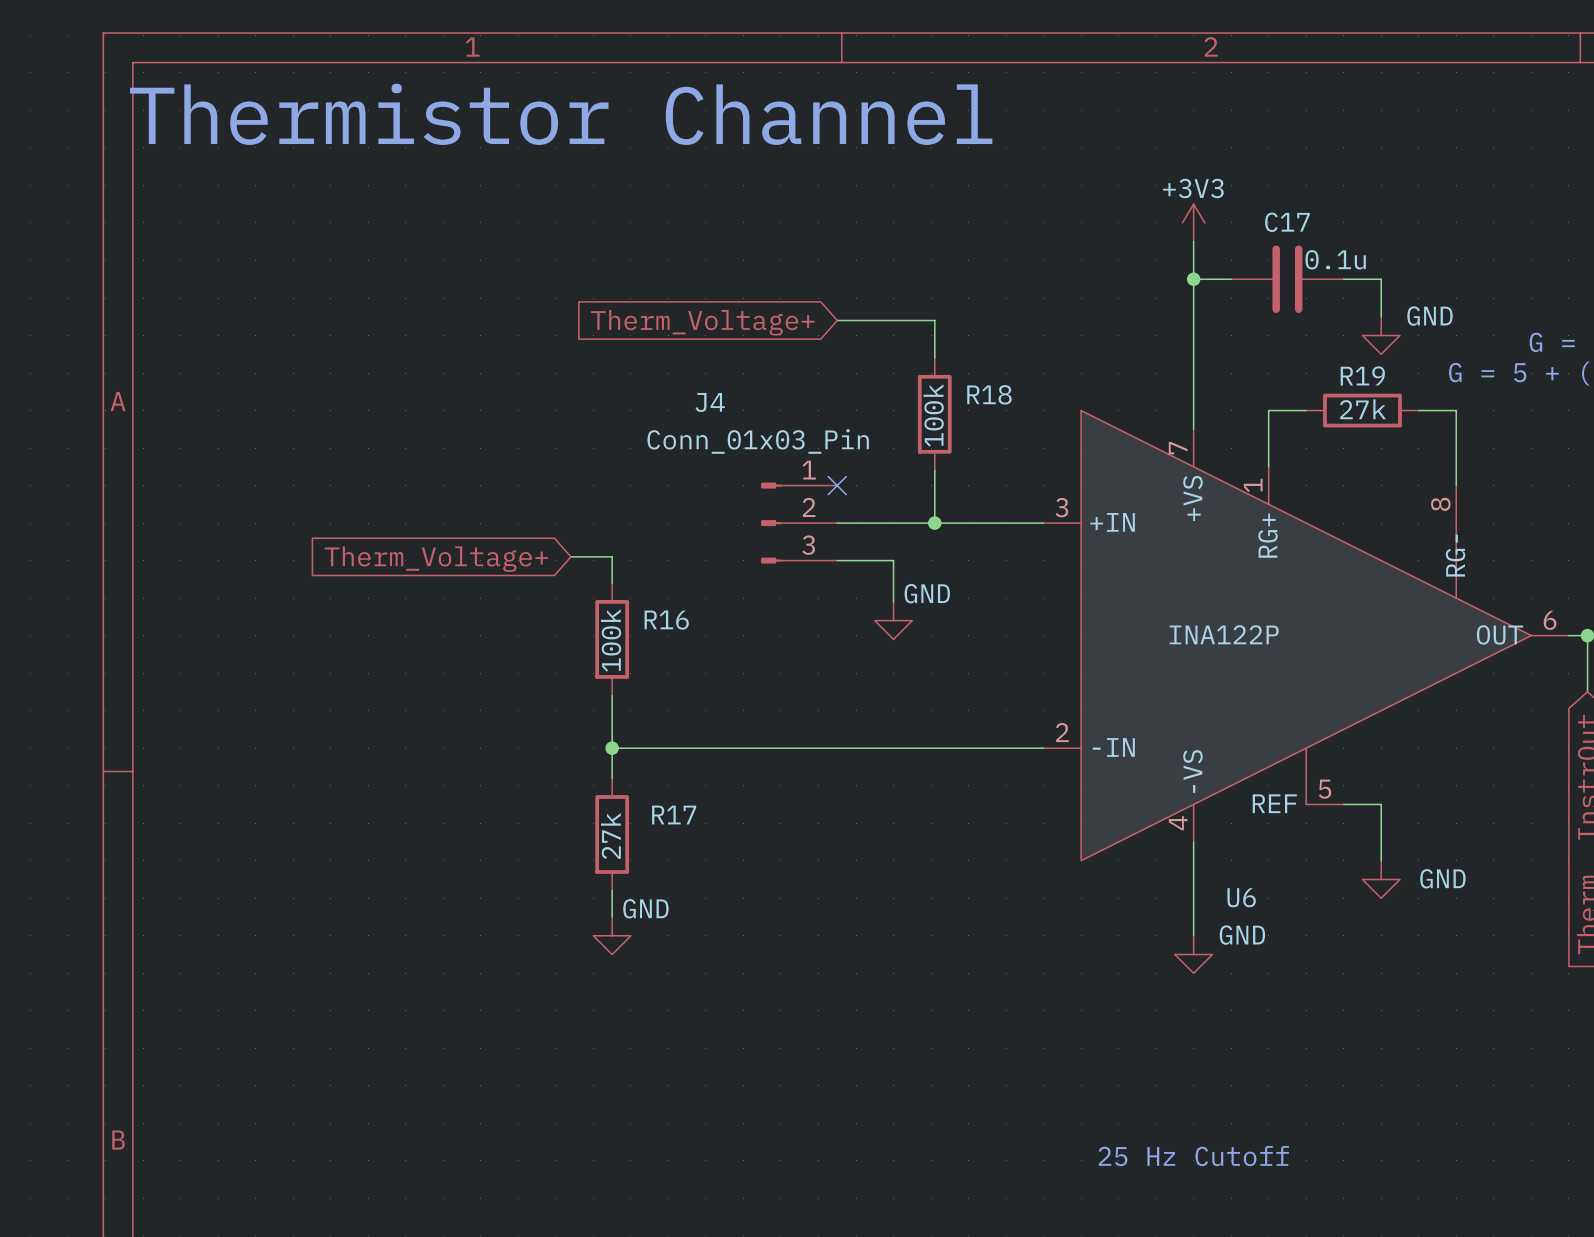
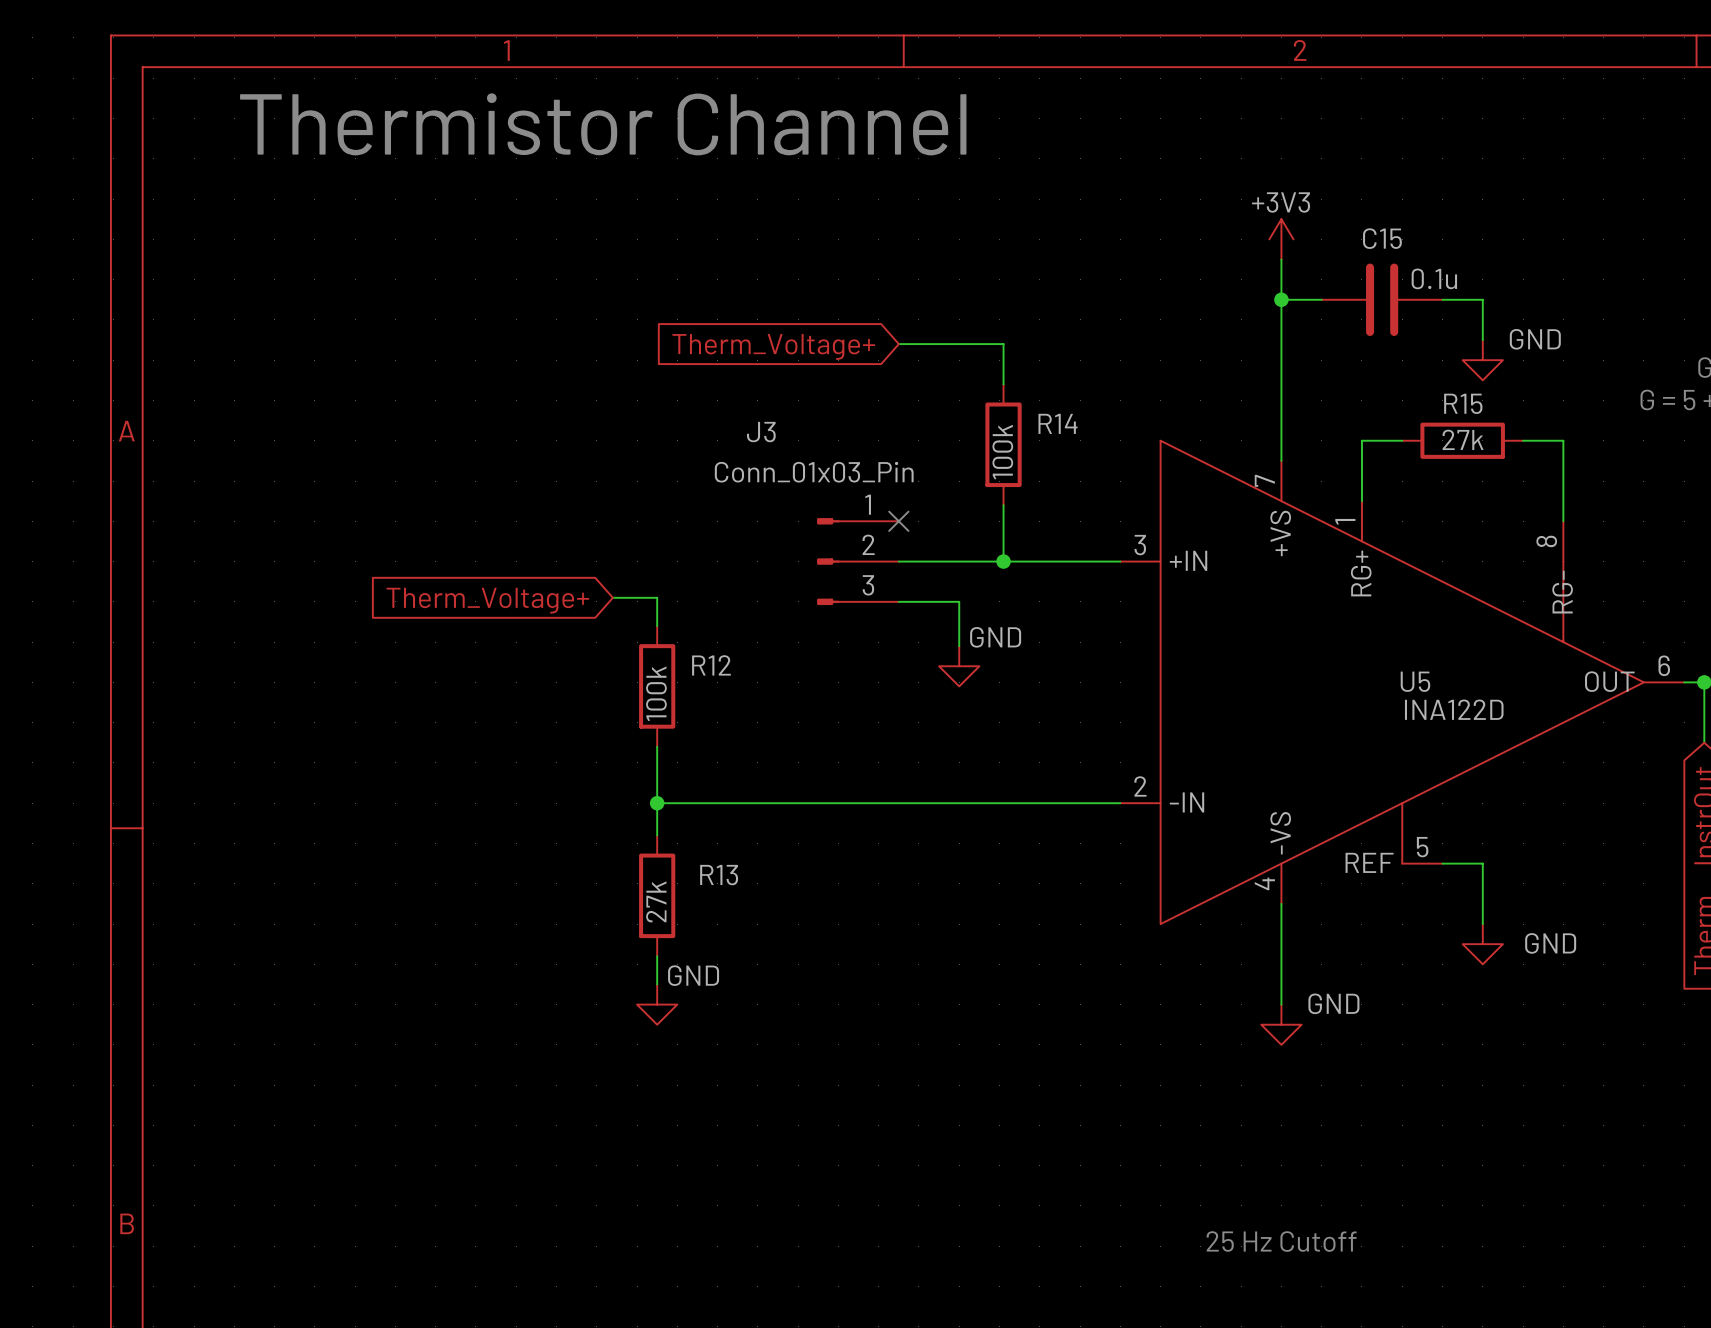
C17 name: C17 (1287, 222) -> C15 (1382, 238)
R19 name: R19 (1362, 375) -> R15 (1463, 403)
R18 name: R18 (989, 394) -> R14 (1057, 423)
J4 name: J4 (710, 402) -> J3 (761, 432)
R16 name: R16 (666, 620) -> R12 (711, 665)
U6 value: INA122P (1224, 634) -> INA122D (1454, 709)
R17 name: R17 (674, 815) -> R13 (719, 875)
U6 name: U6 (1241, 897) -> U5 (1415, 681)

